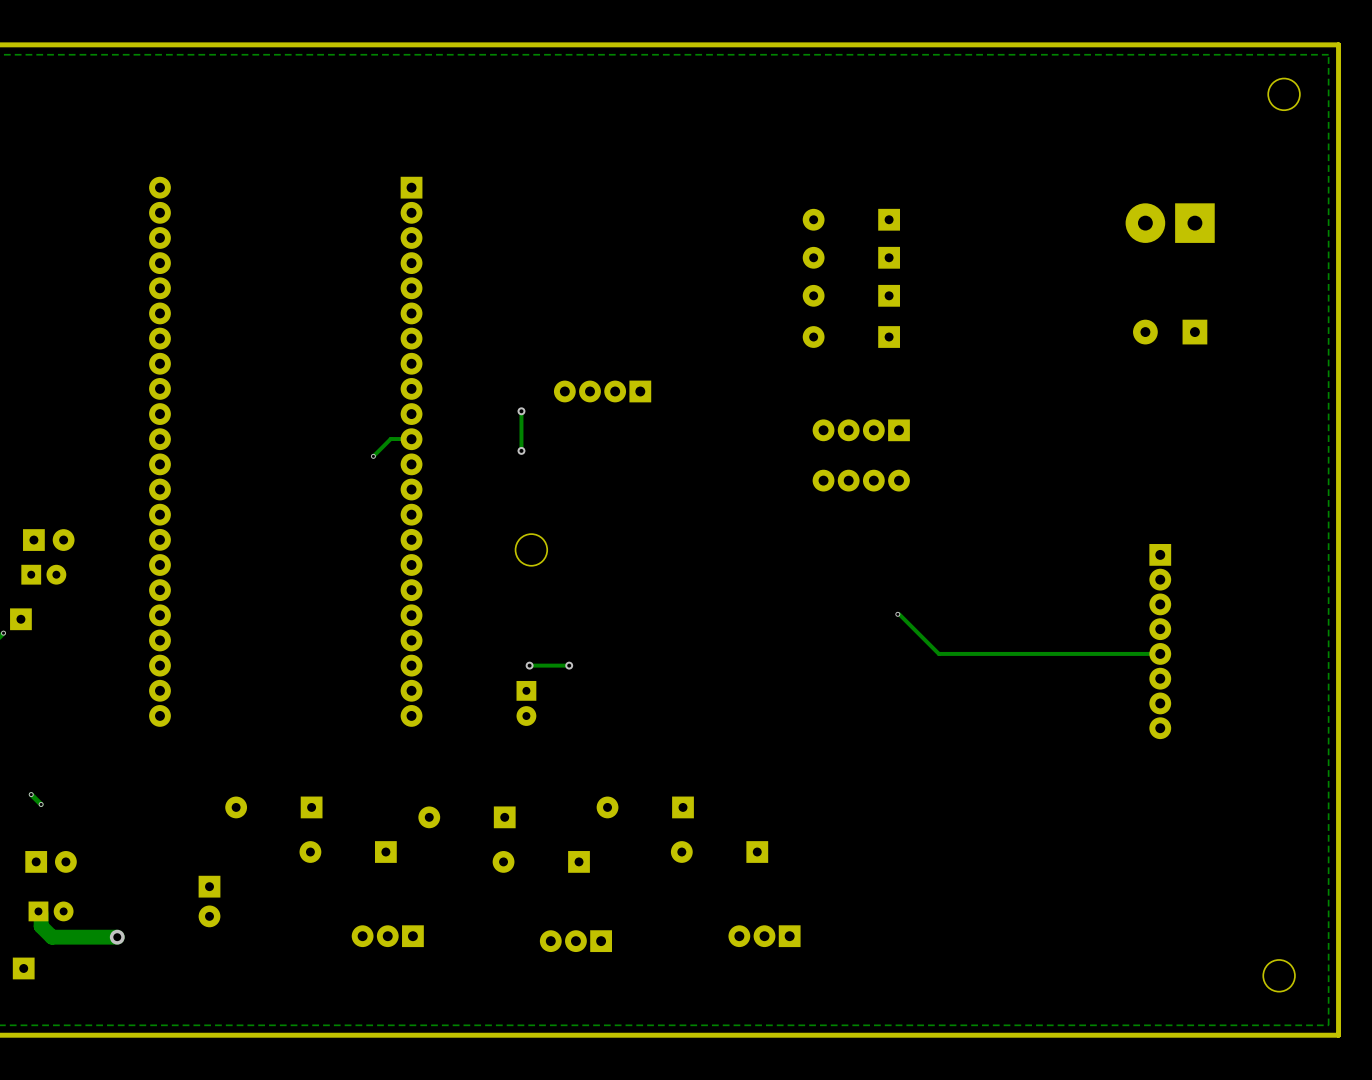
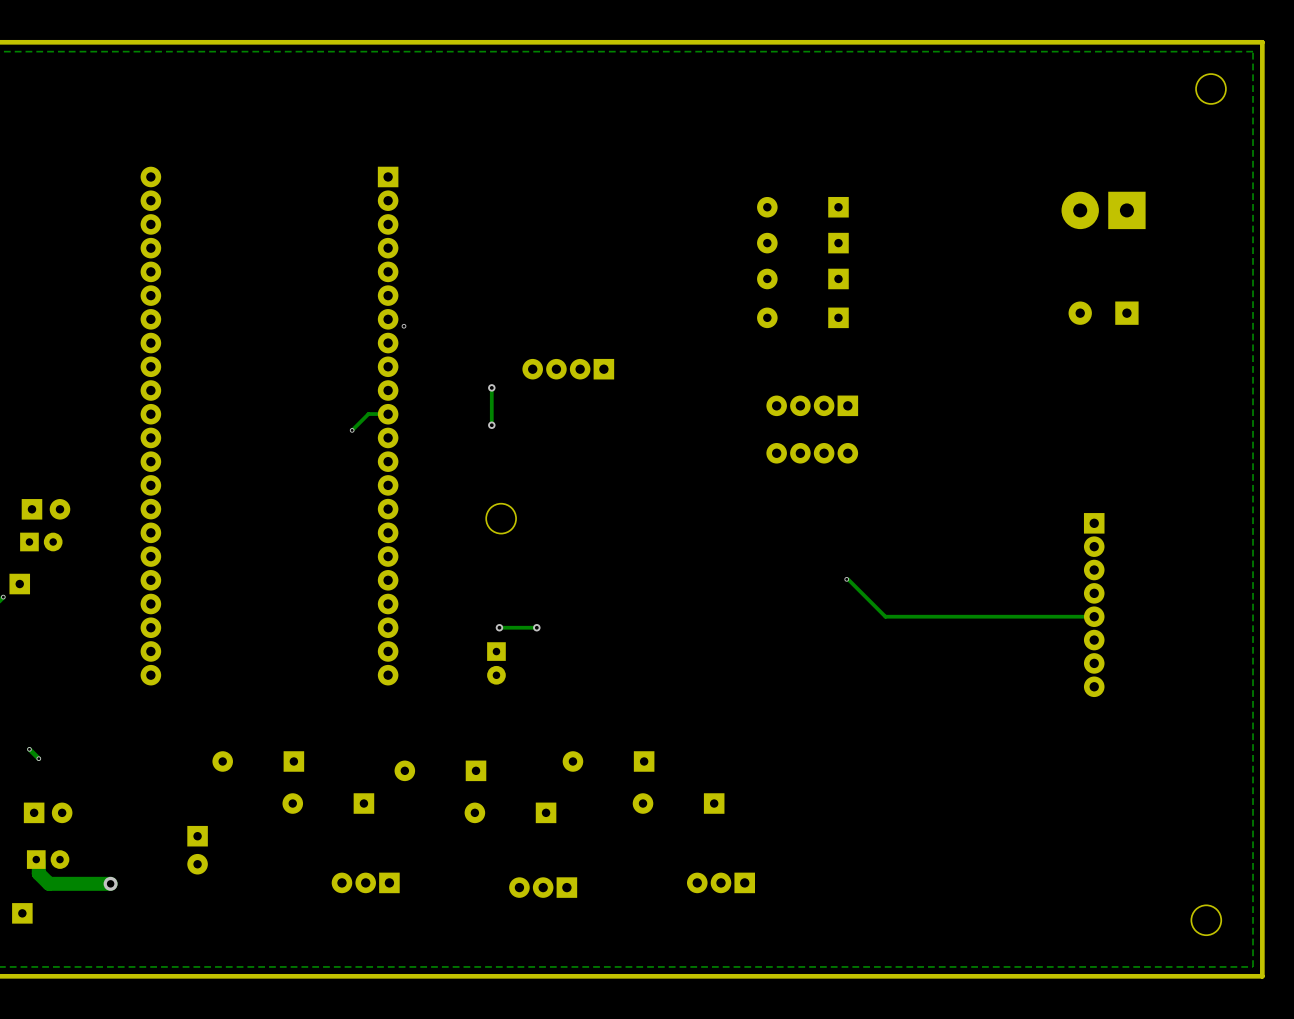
via: none -> (404, 326)

